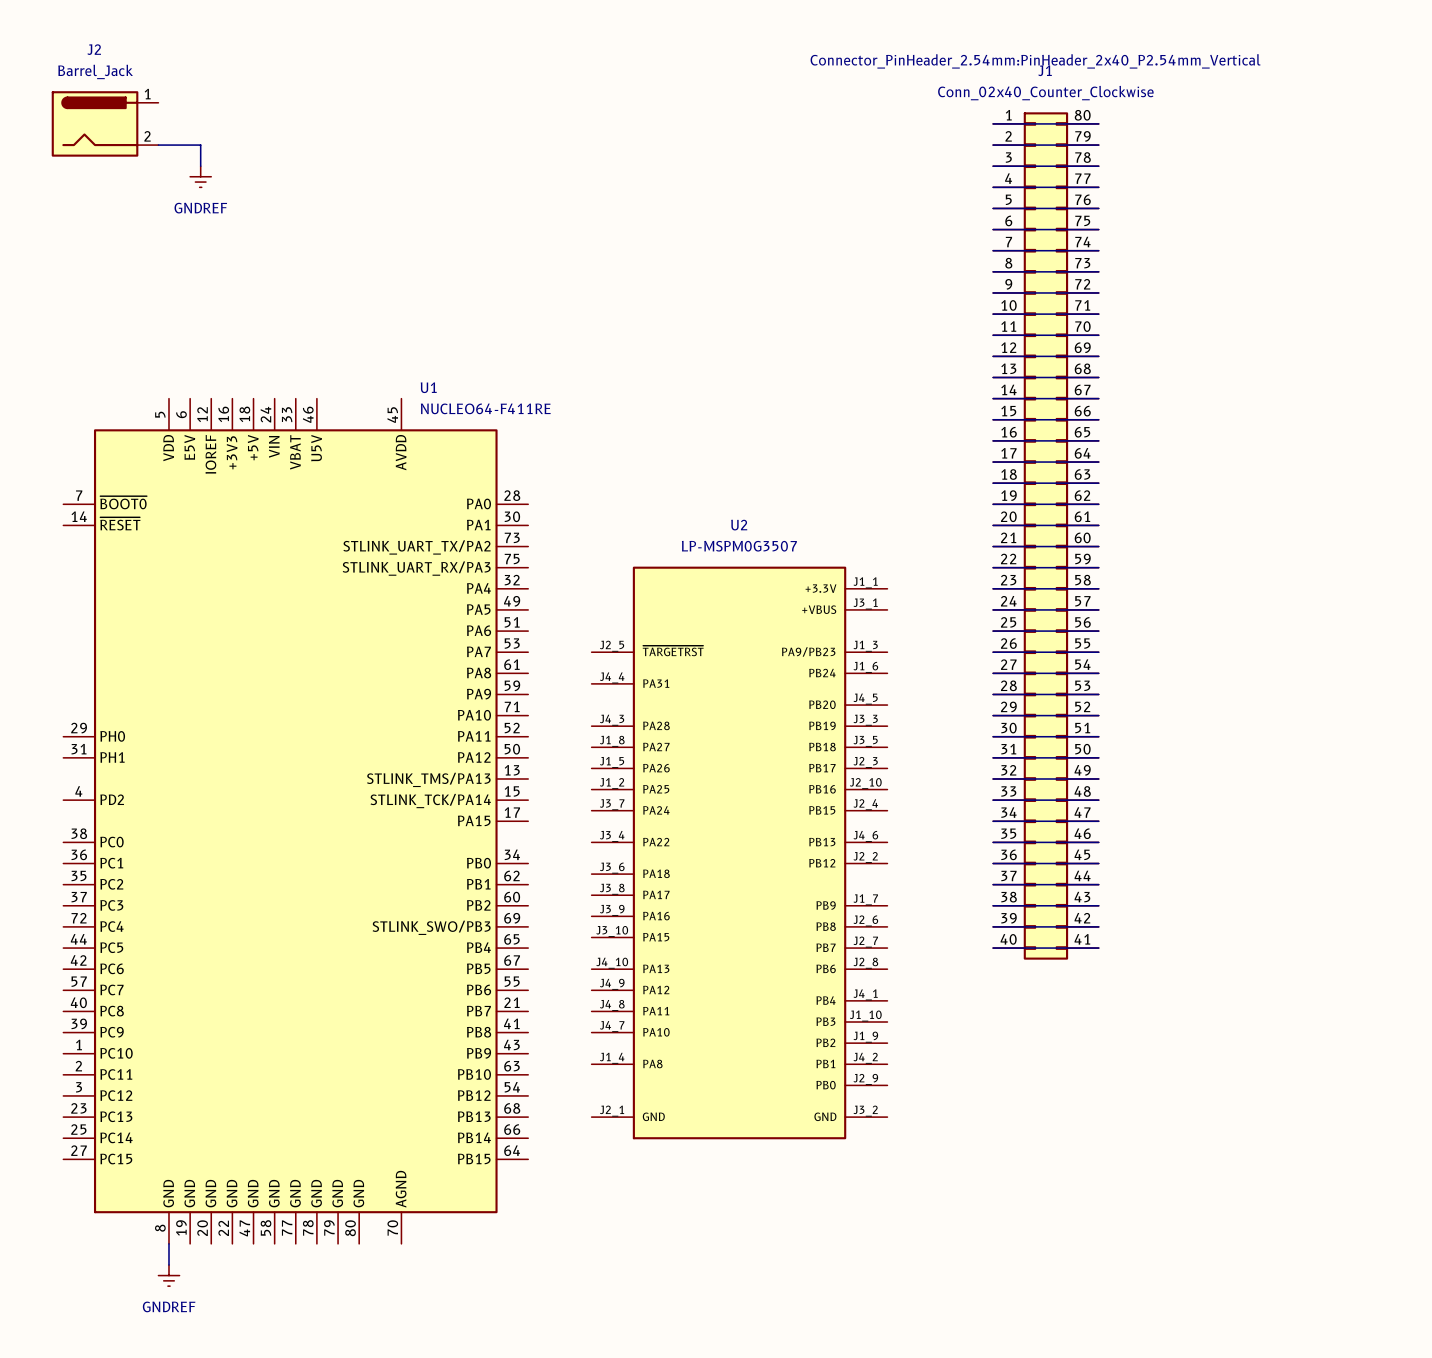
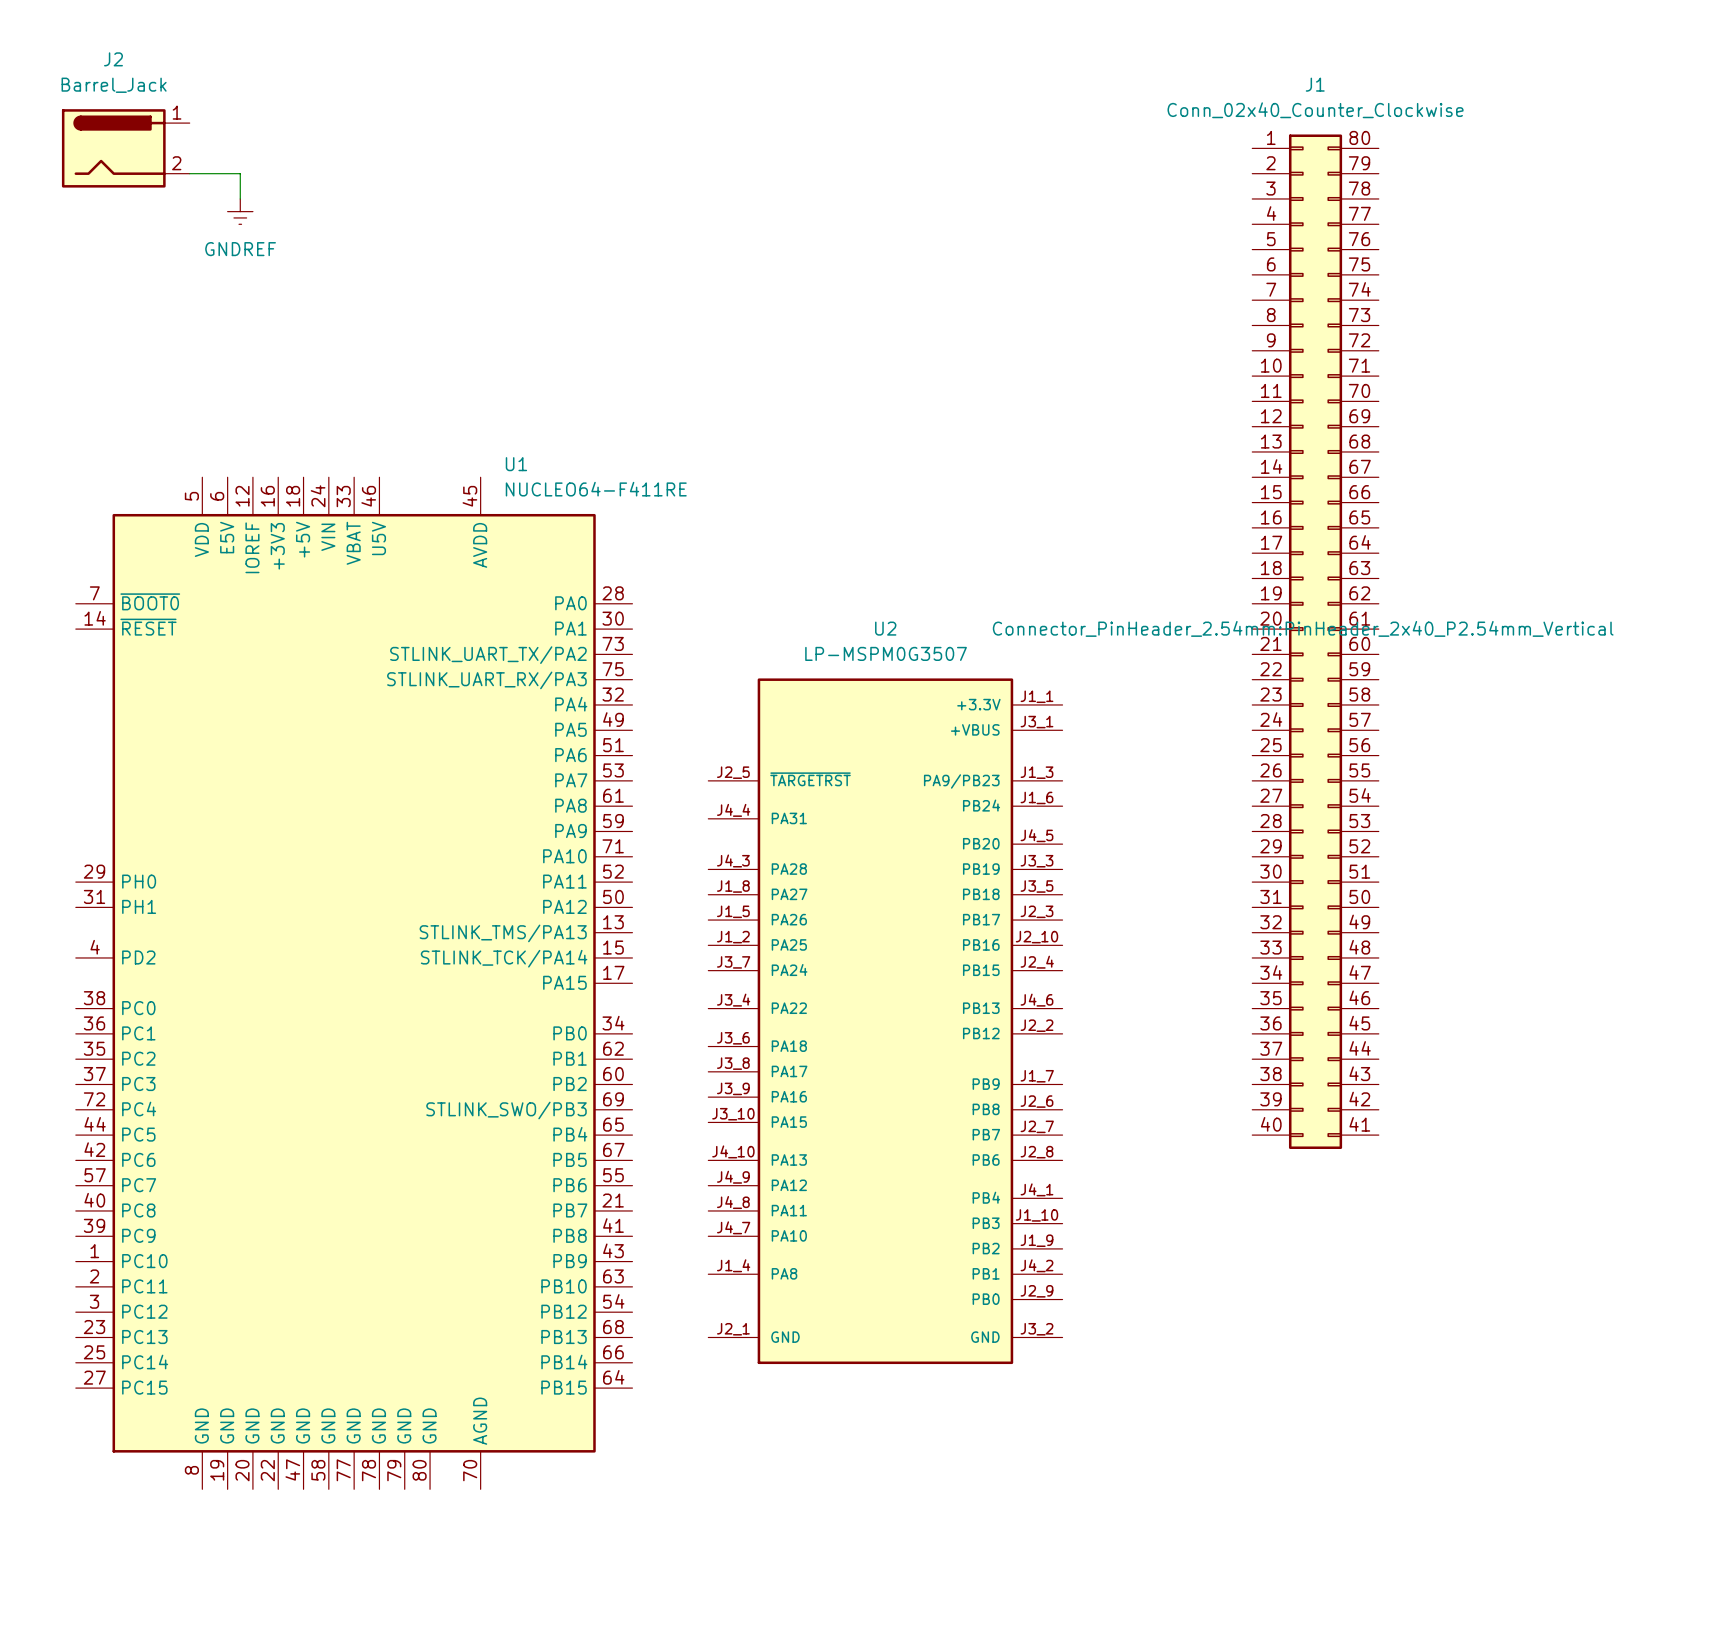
J1 text position: Connector_PinHeader_2.54mm:PinHeader_2x40_P2.54mm_Vertical (1035, 61) -> Connector_PinHeader_2.54mm:PinHeader_2x40_P2.54mm_Vertical (1303, 628)
J1 position: (1045, 535) -> (1315, 641)
wire: (168, 1243) (168, 1265) -> none
power symbol: GNDREF (168, 1275) -> none

